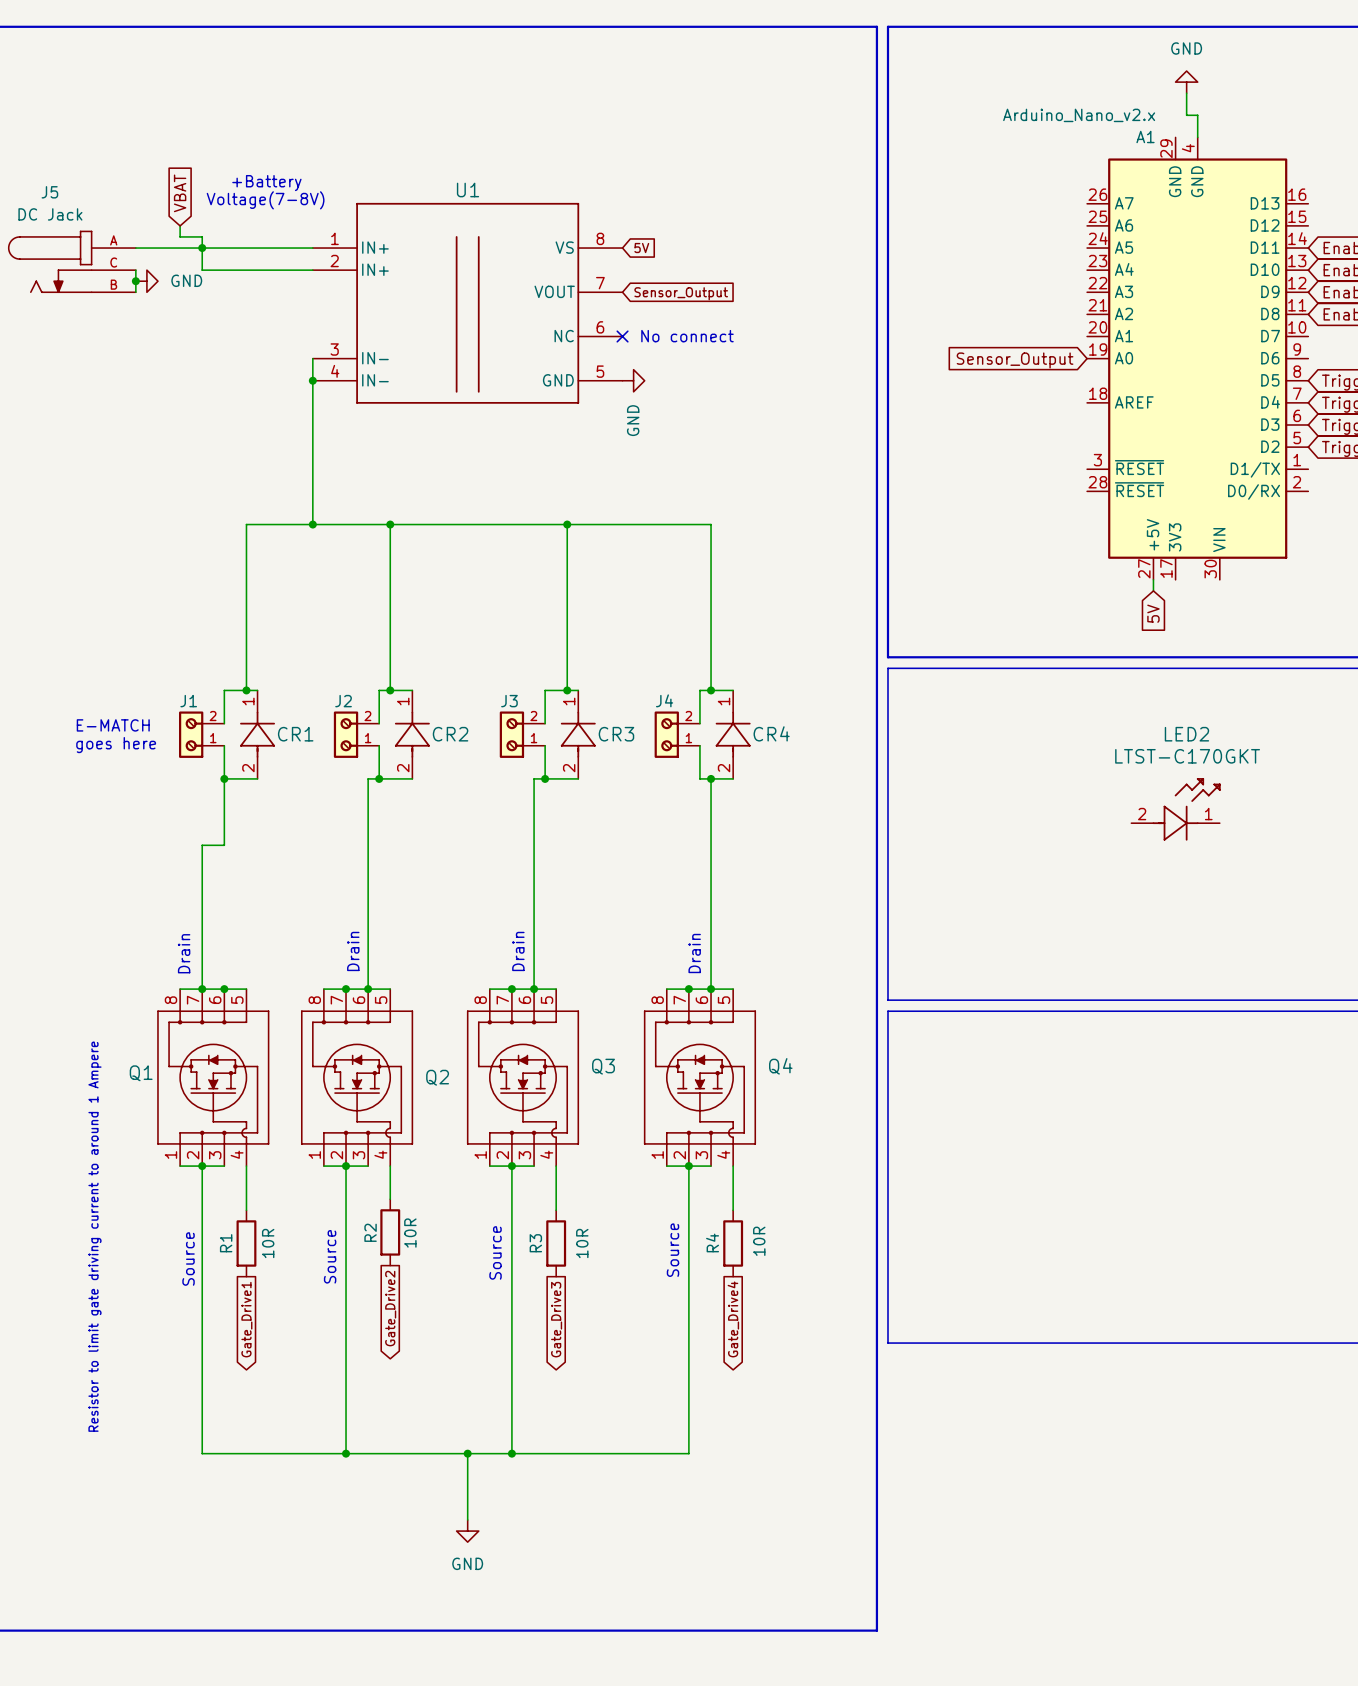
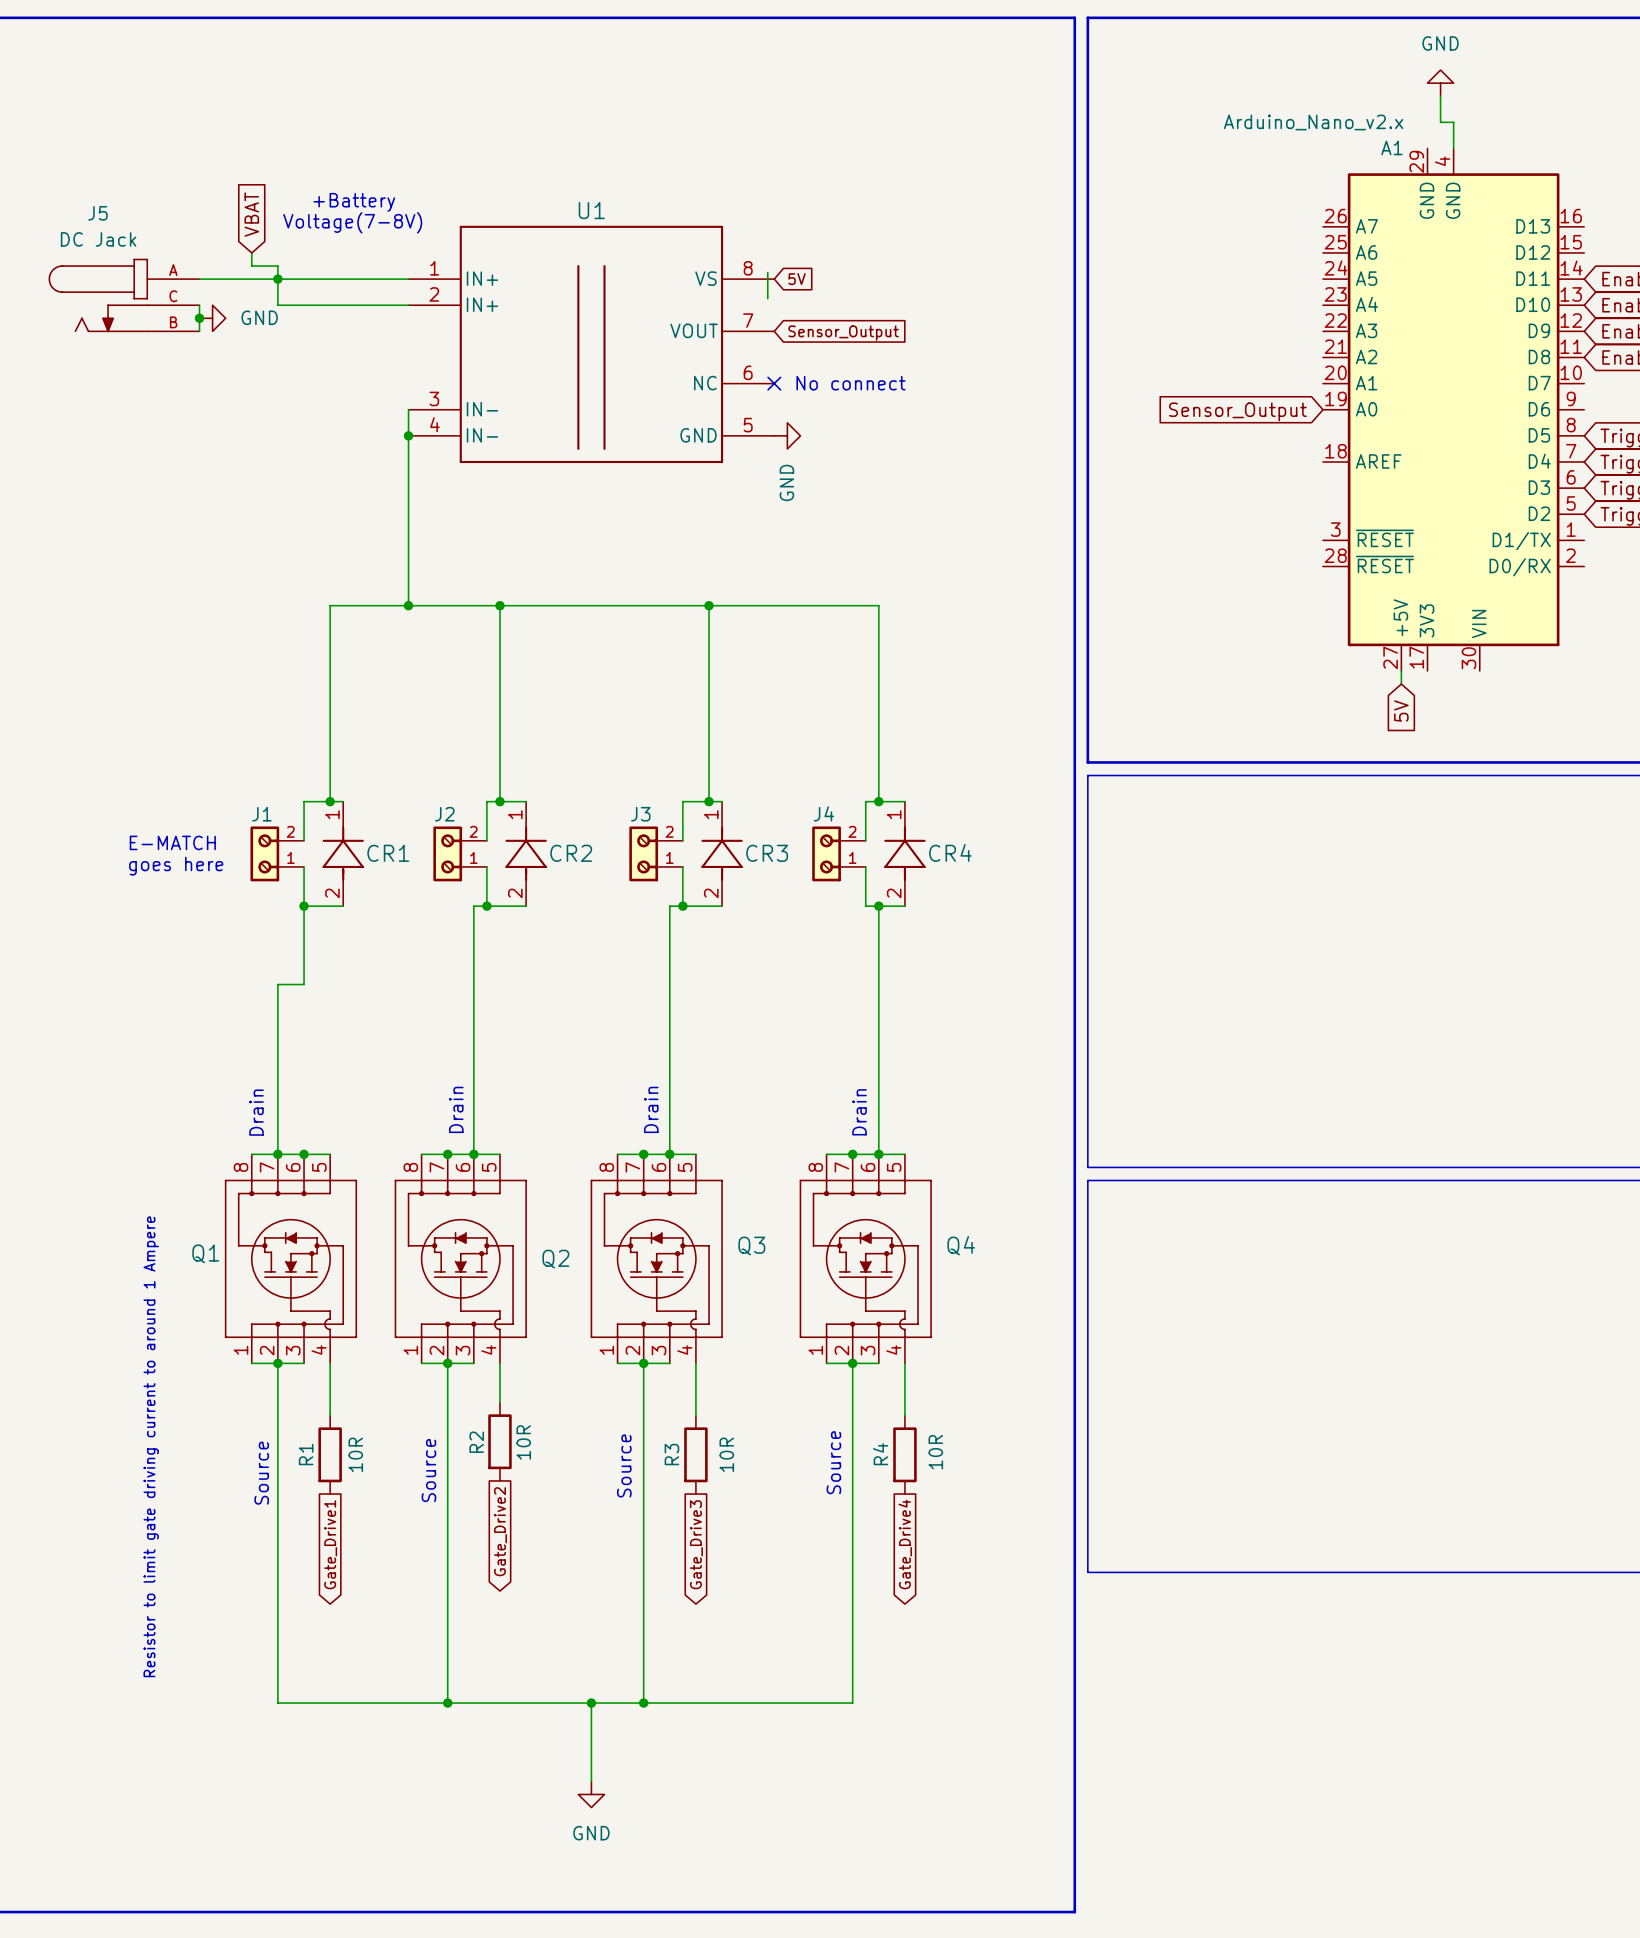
wire: none -> (767, 272) (767, 298)
LED2: LTST-C170GKT (1176, 809) -> none

